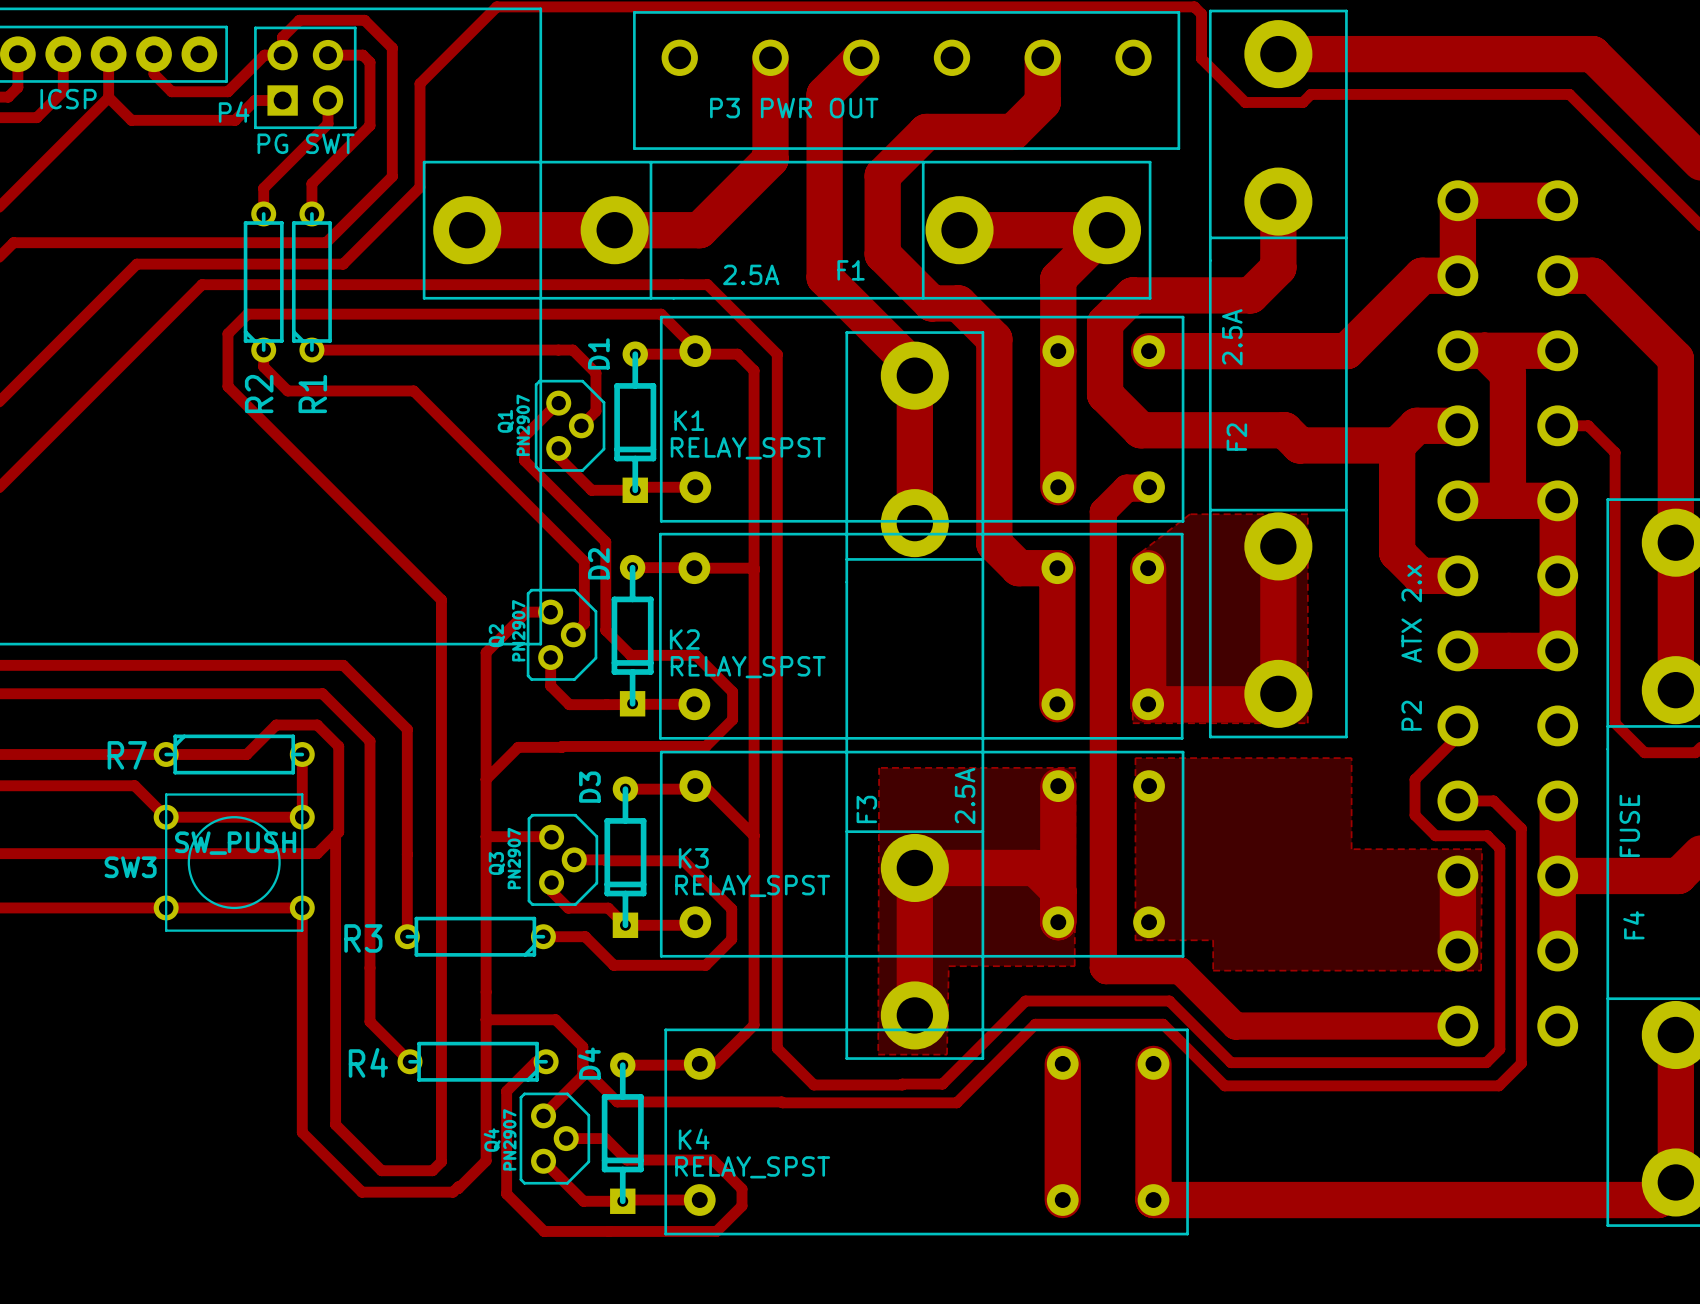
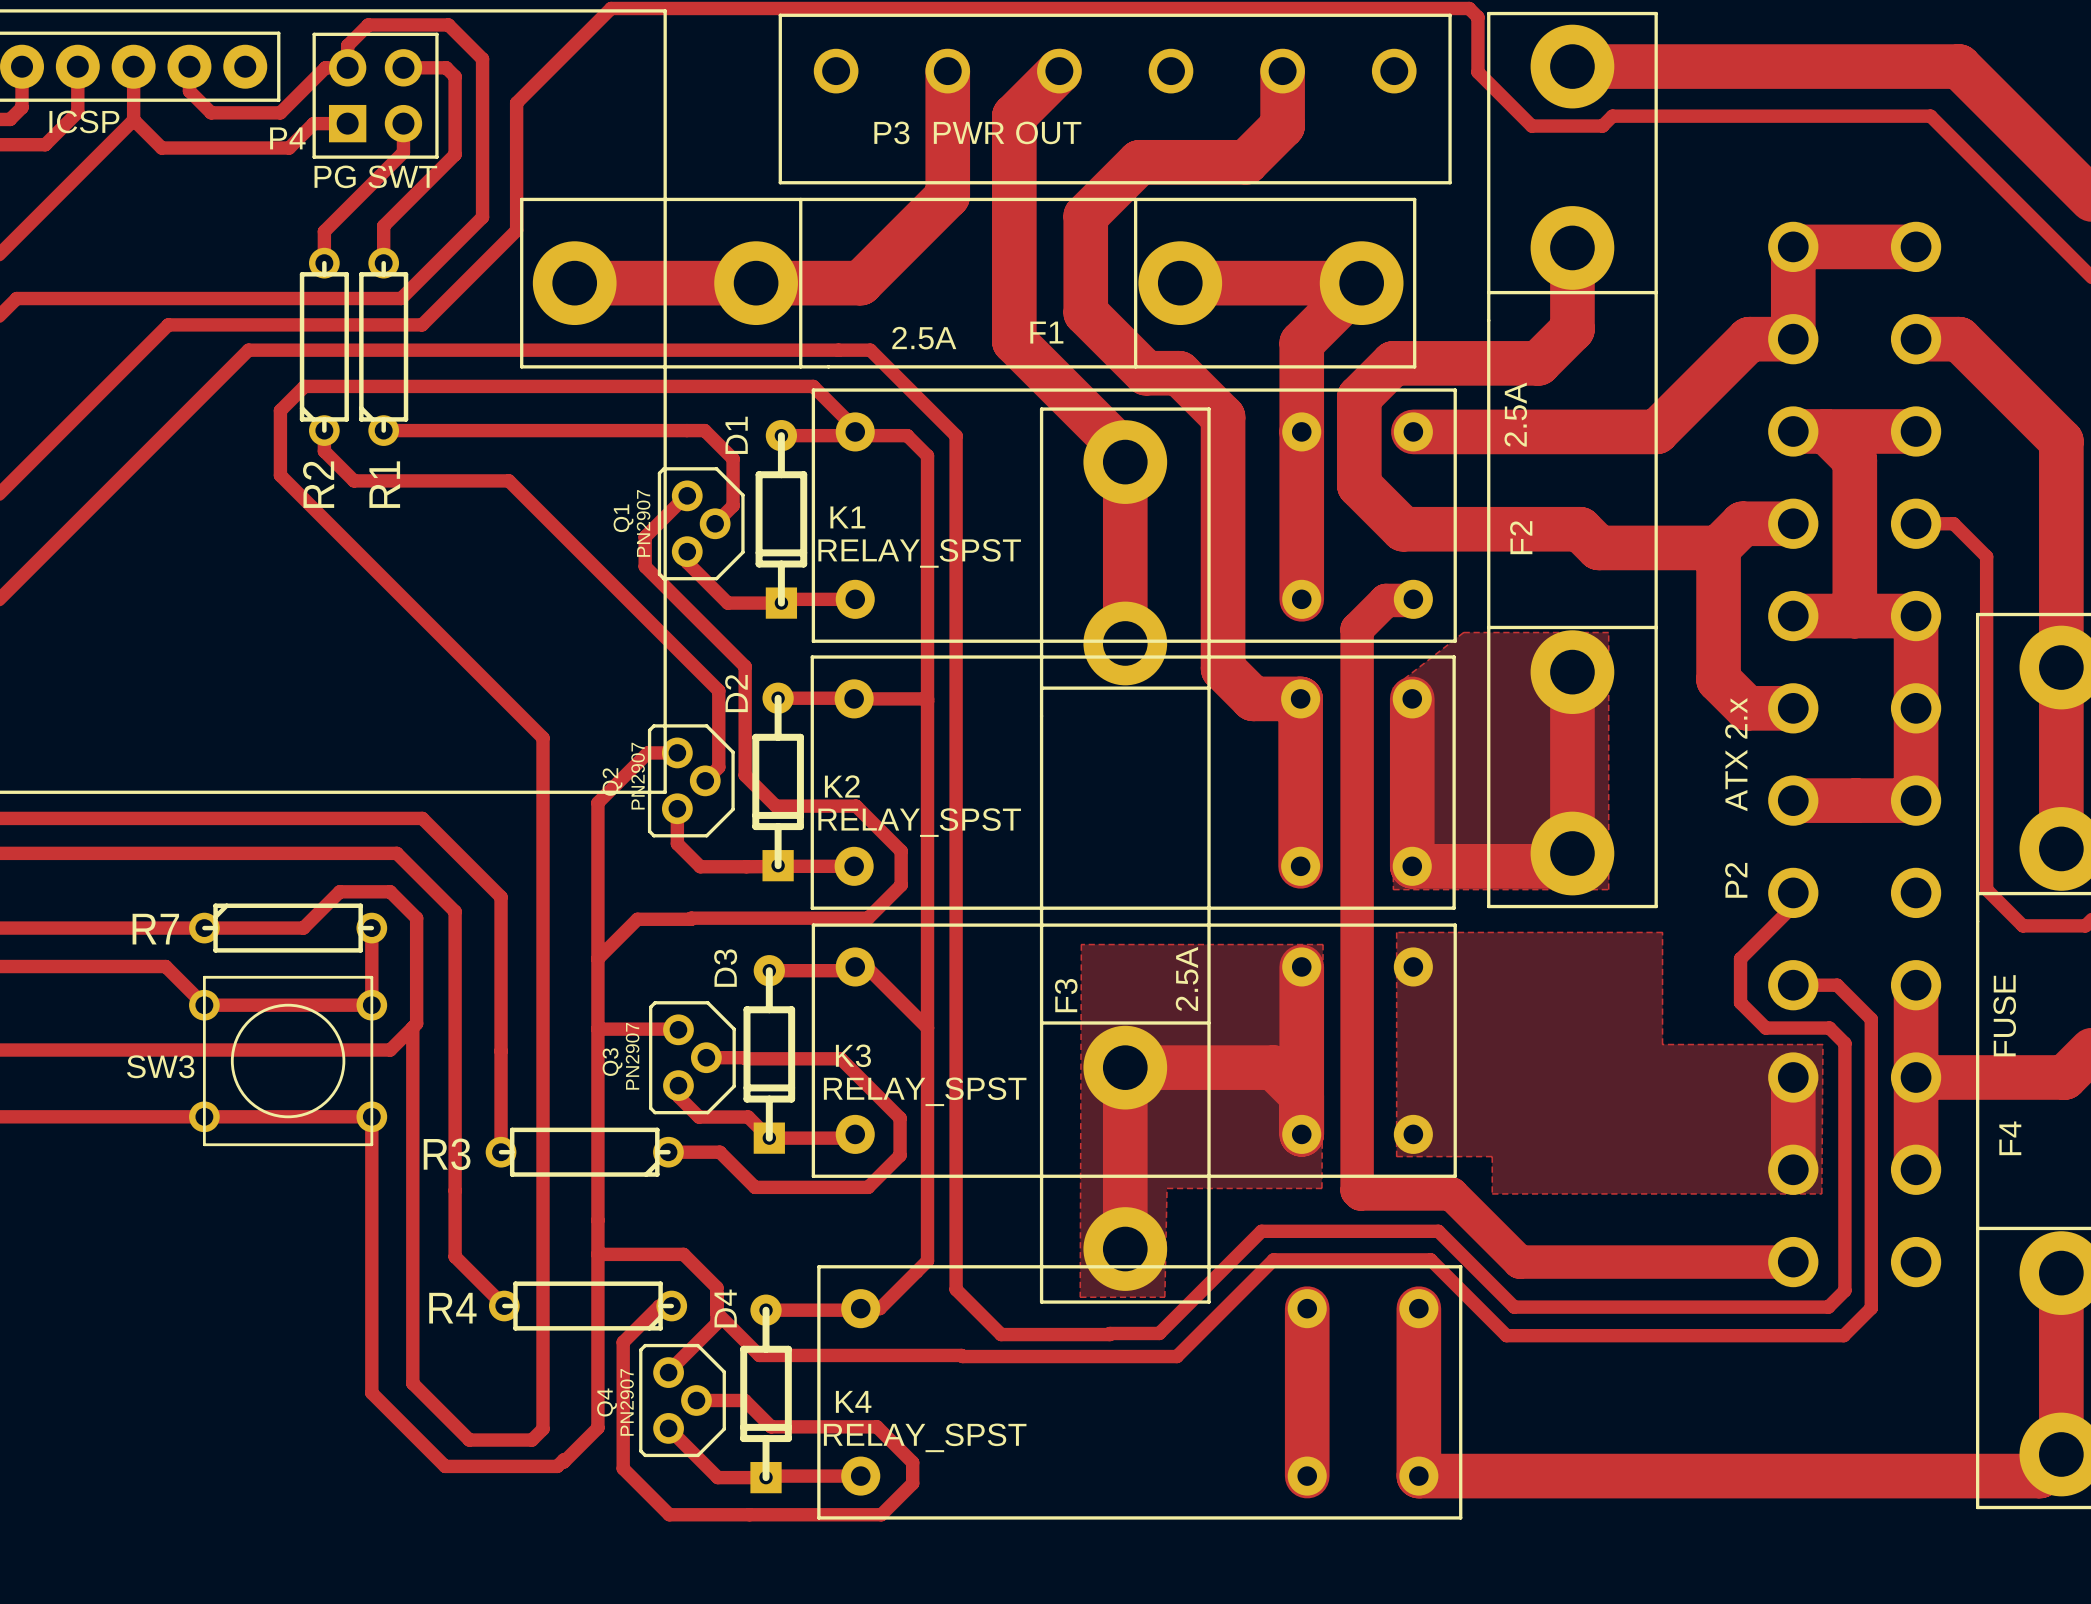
SW3 value: SW_PUSH (235, 843) -> none

